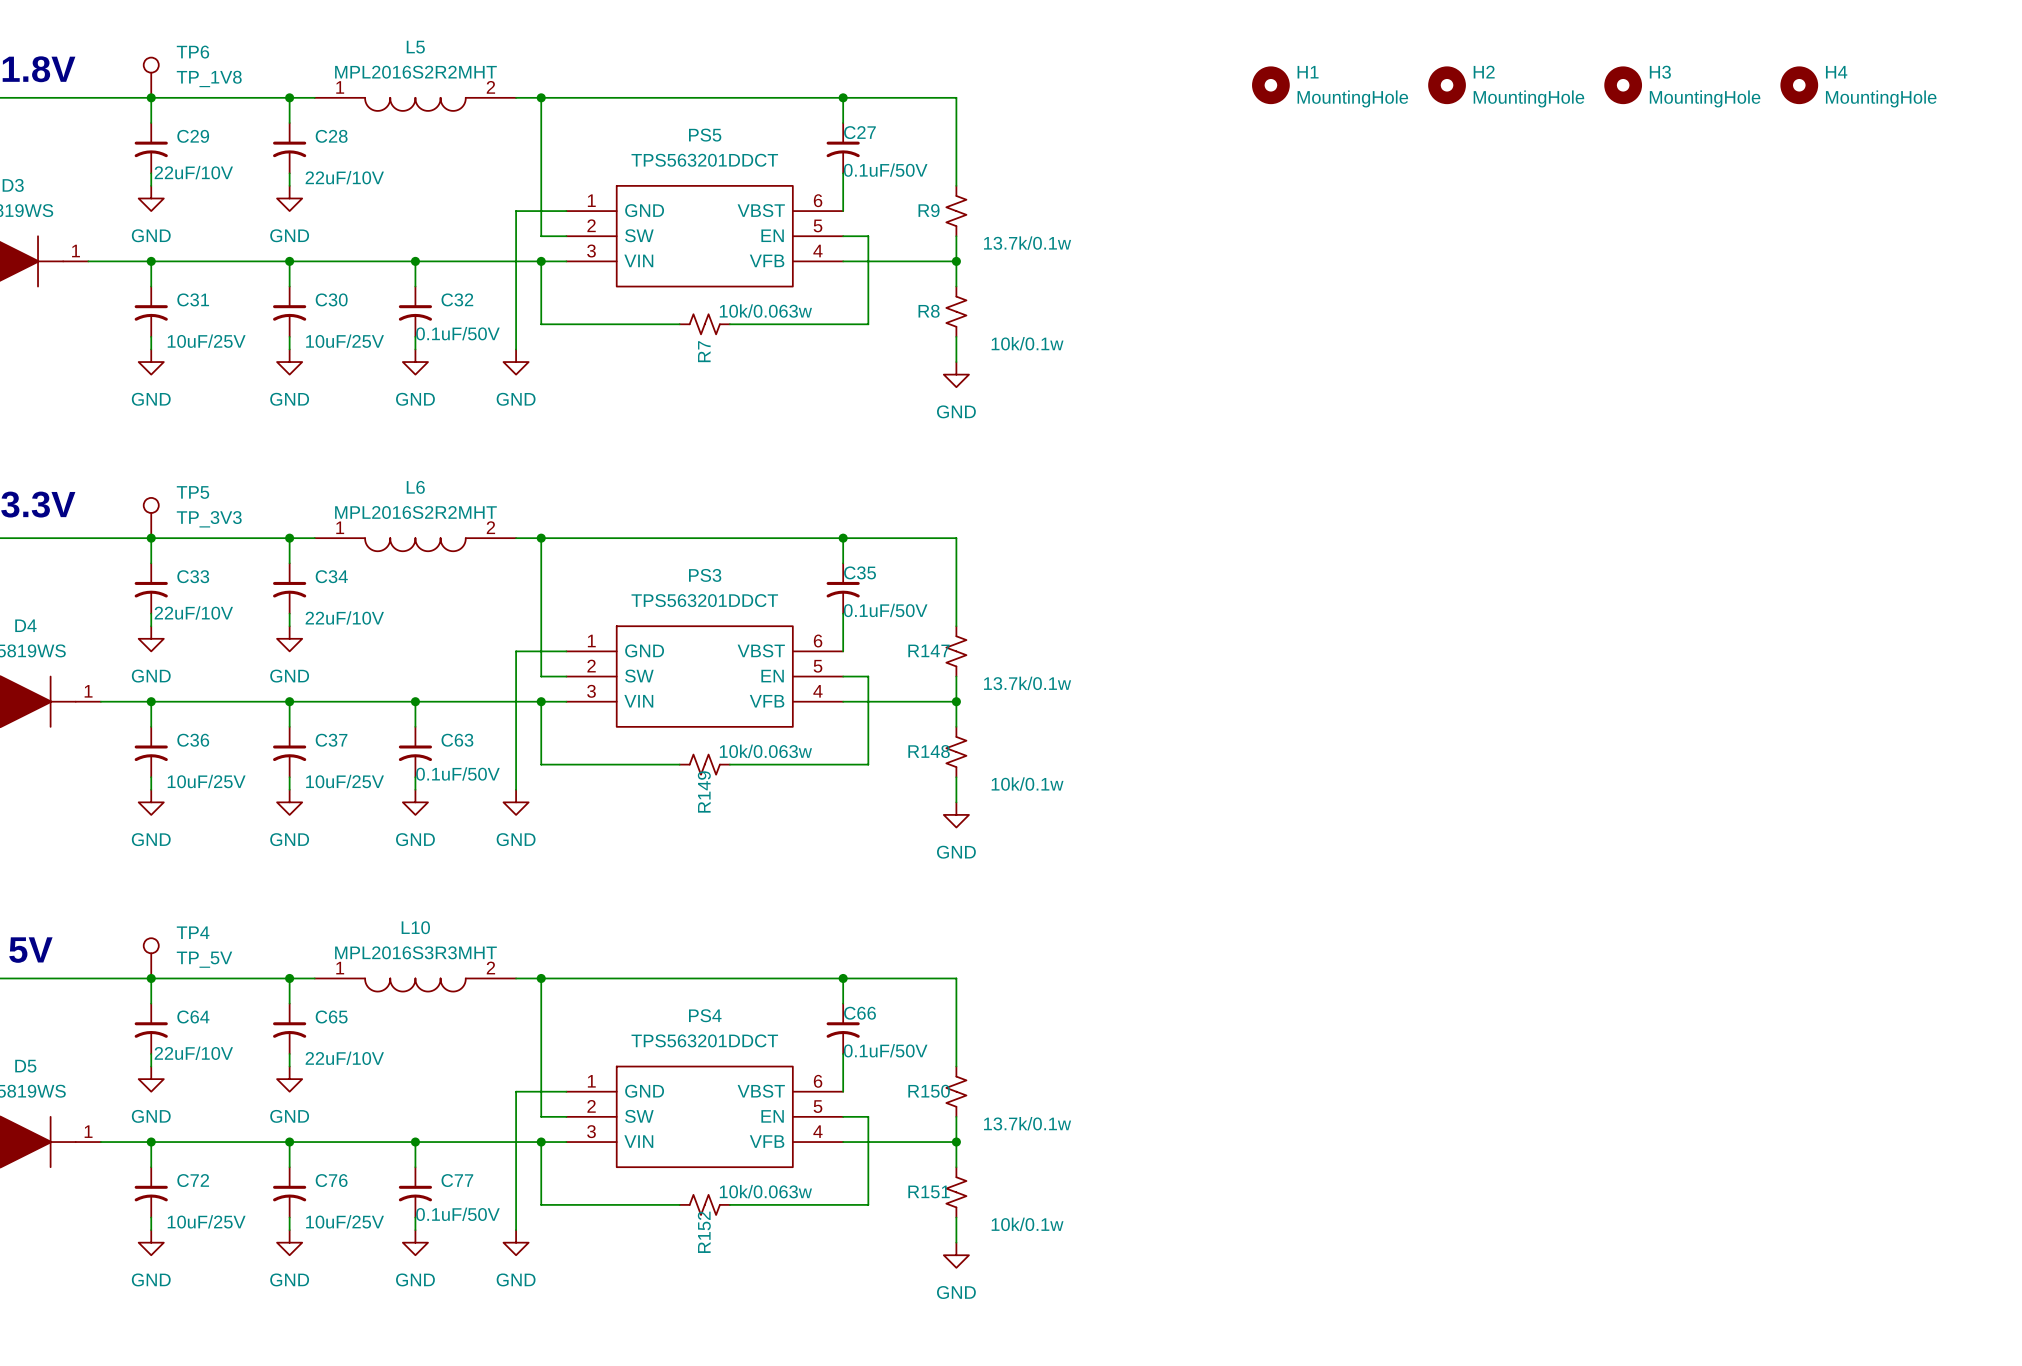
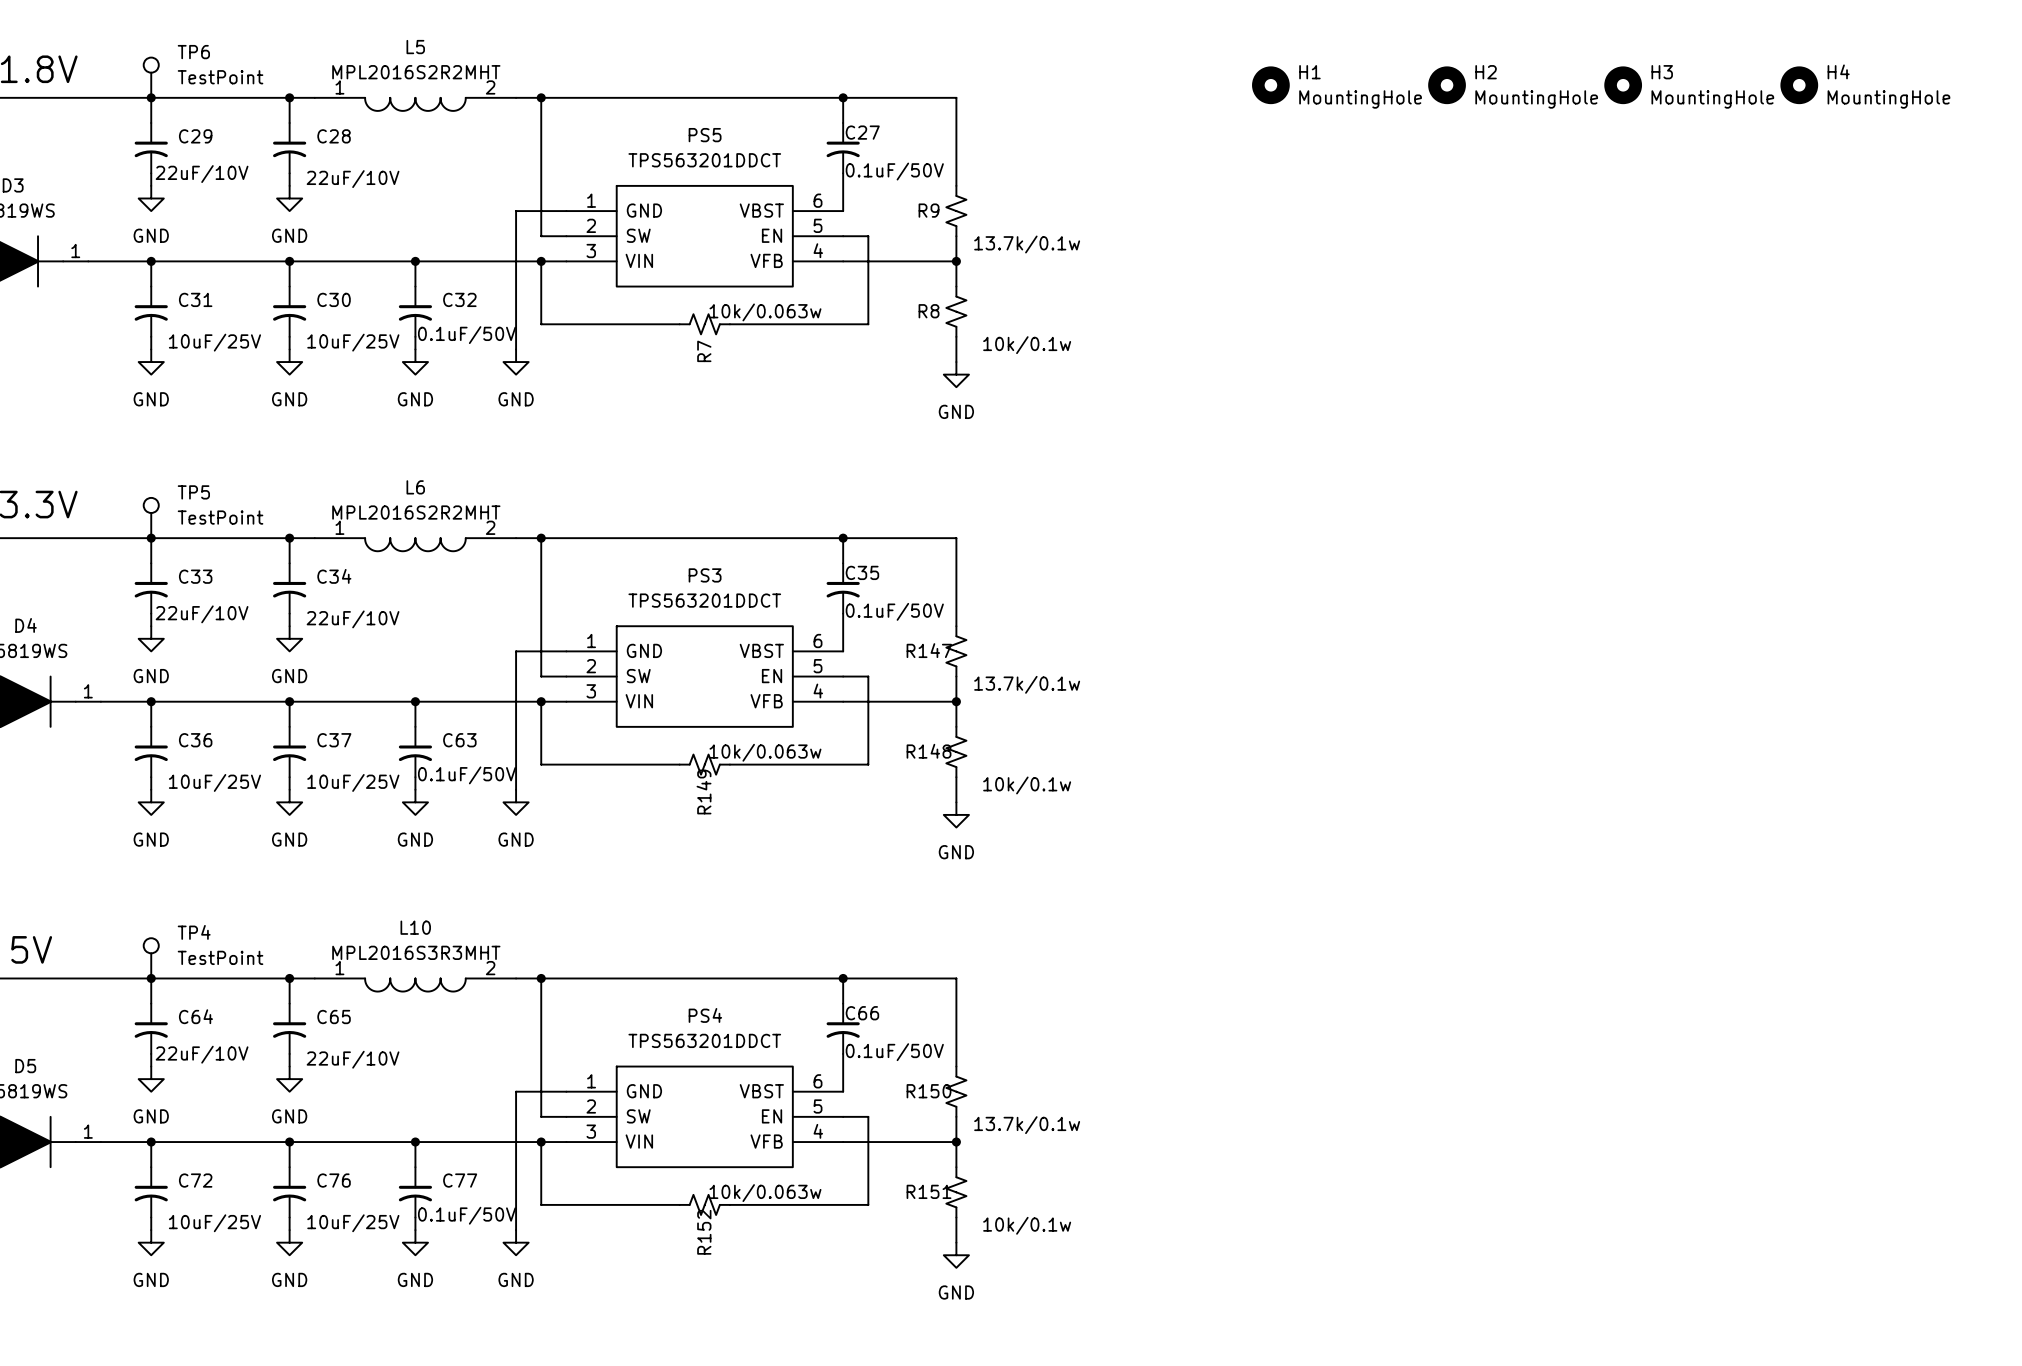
TP6 value: TP_1V8 (209, 78) -> TestPoint (220, 77)
TP5 value: TP_3V3 (209, 519) -> TestPoint (220, 517)
TP4 value: TP_5V (204, 959) -> TestPoint (220, 957)

